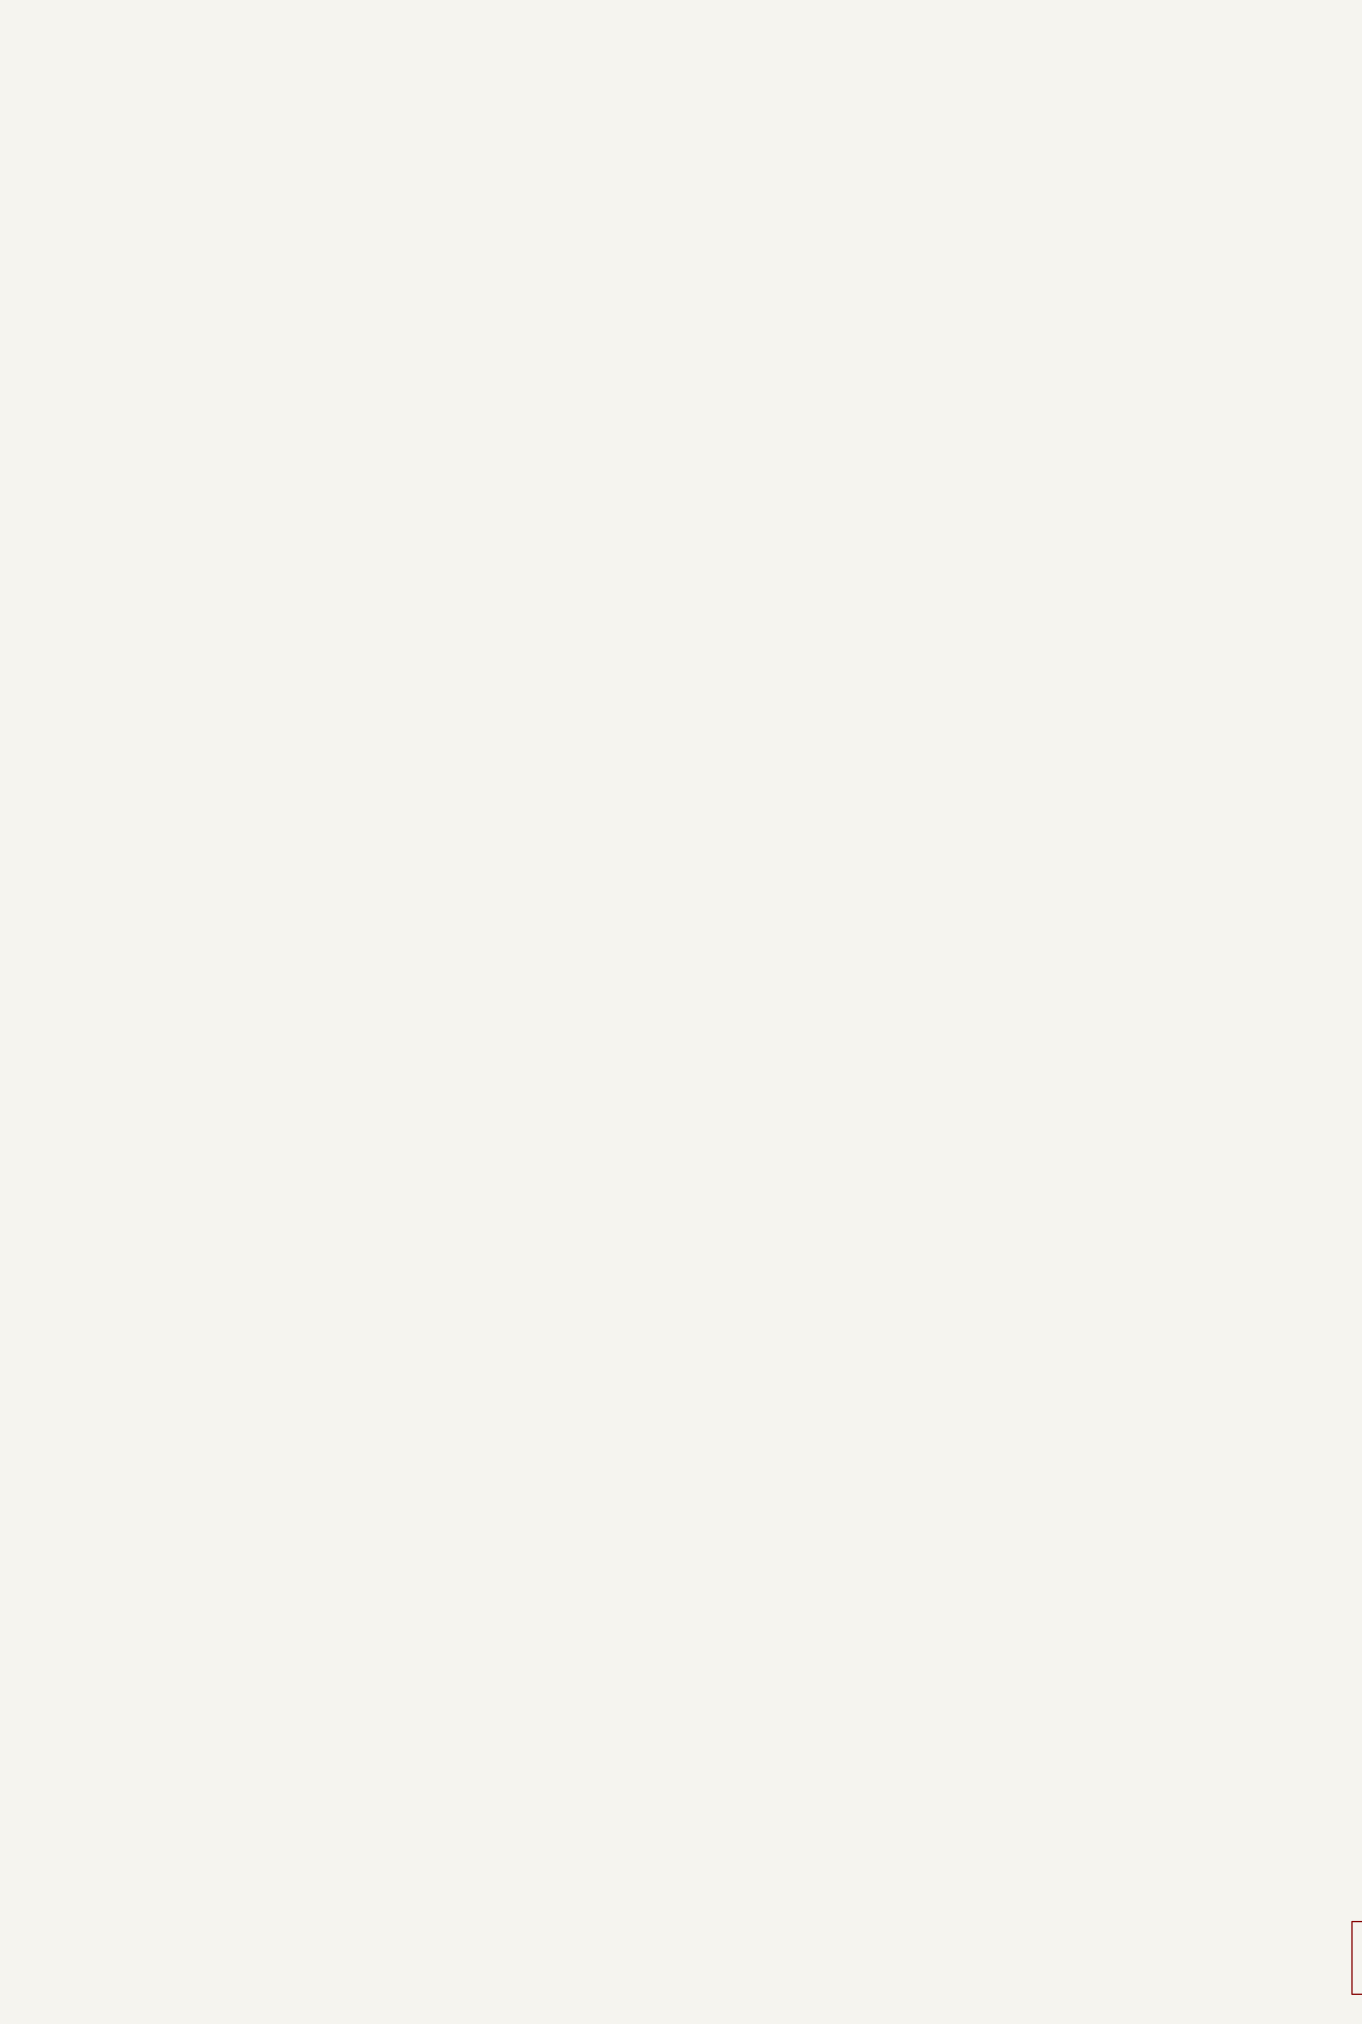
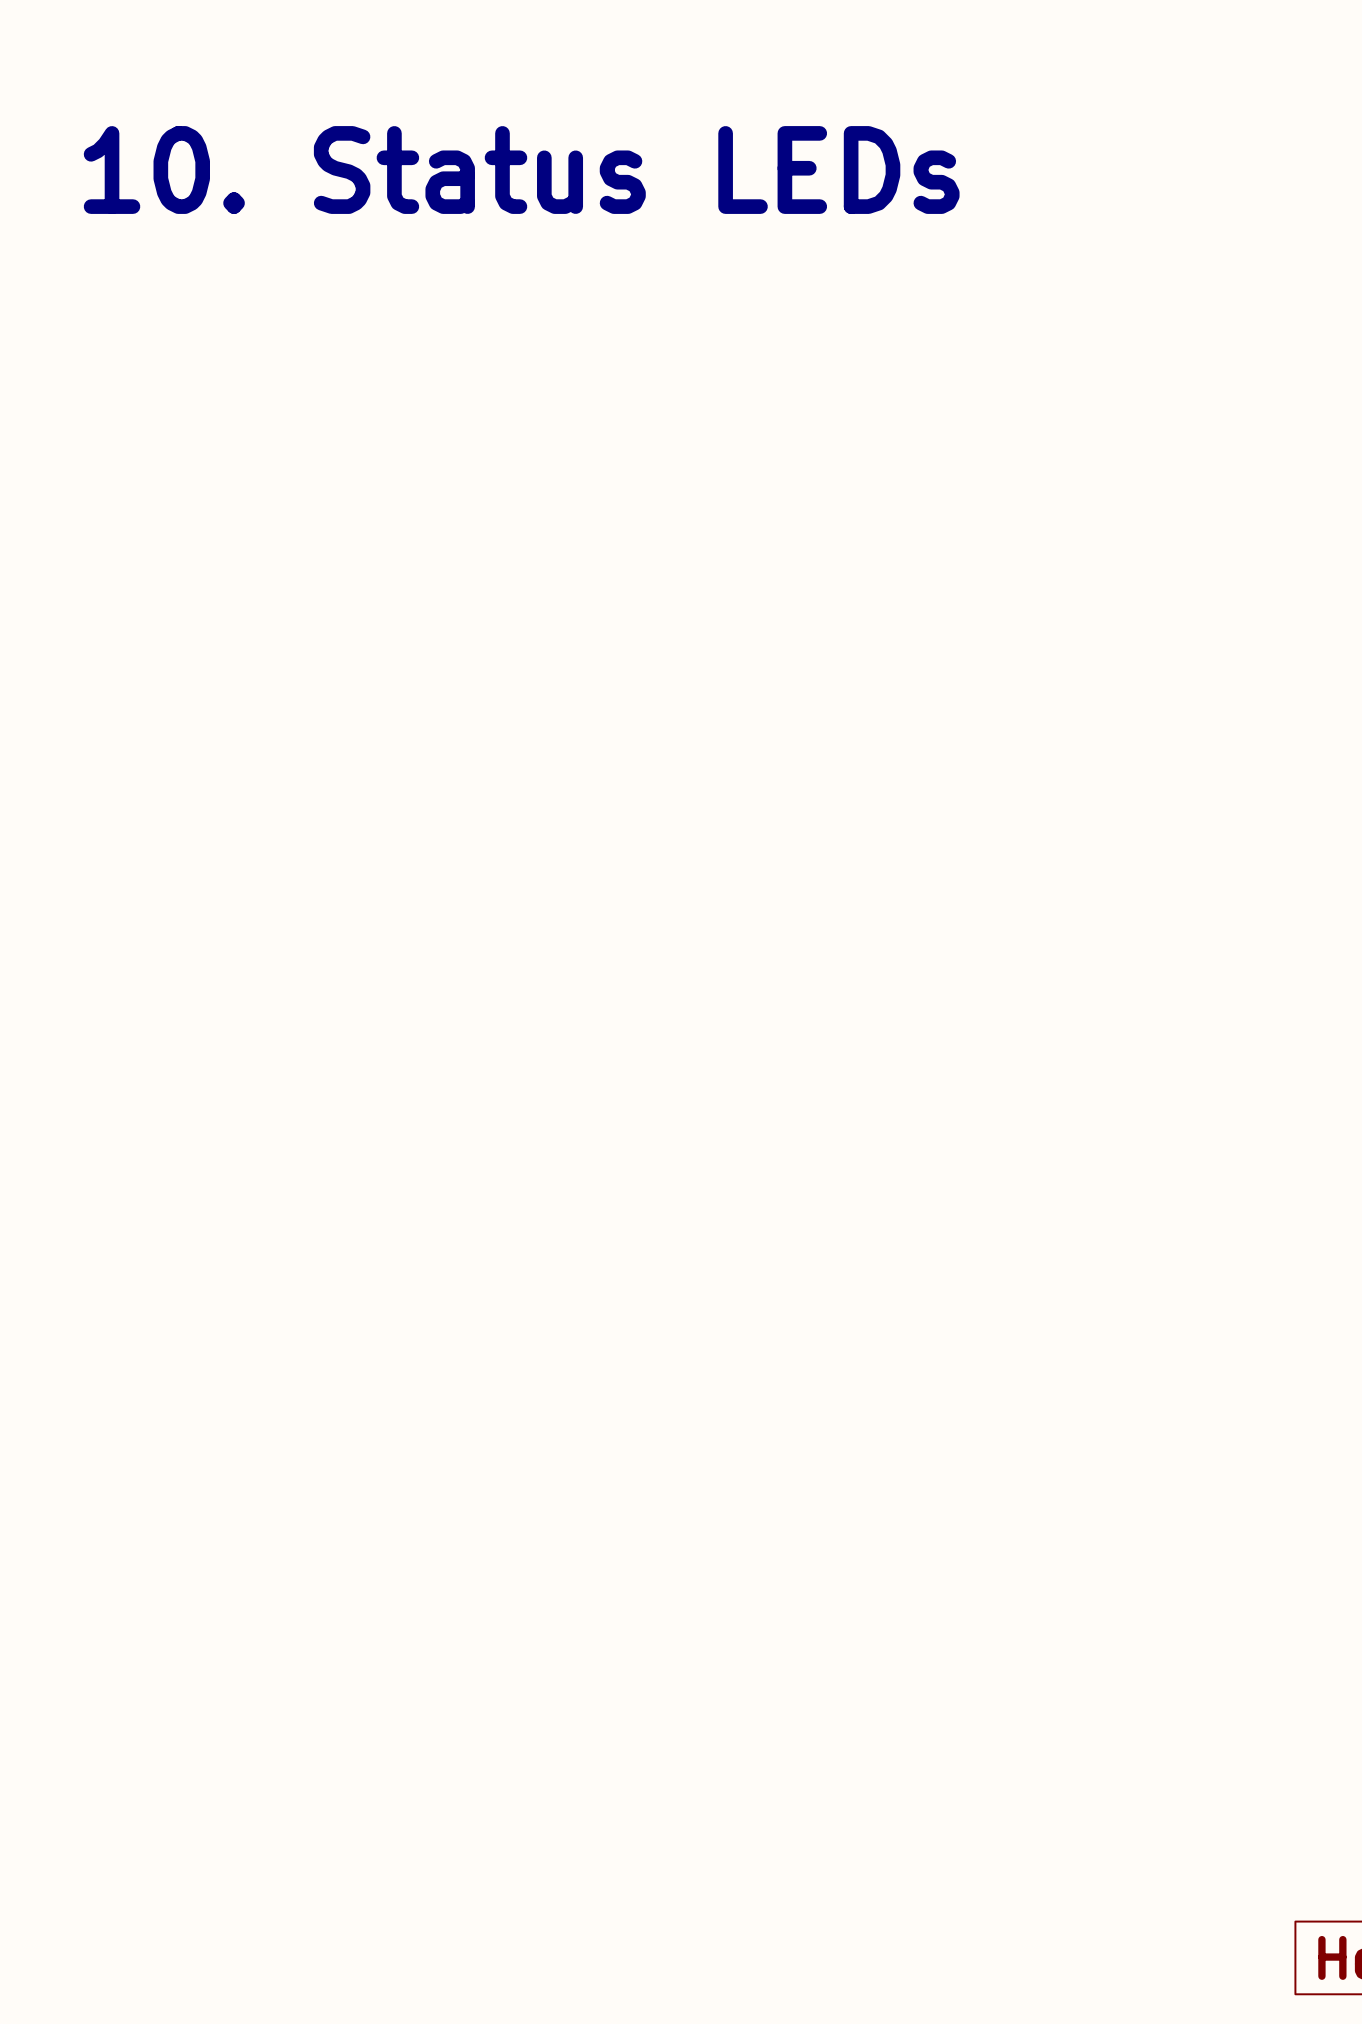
text: none -> 10. Status LEDs (521, 170)

